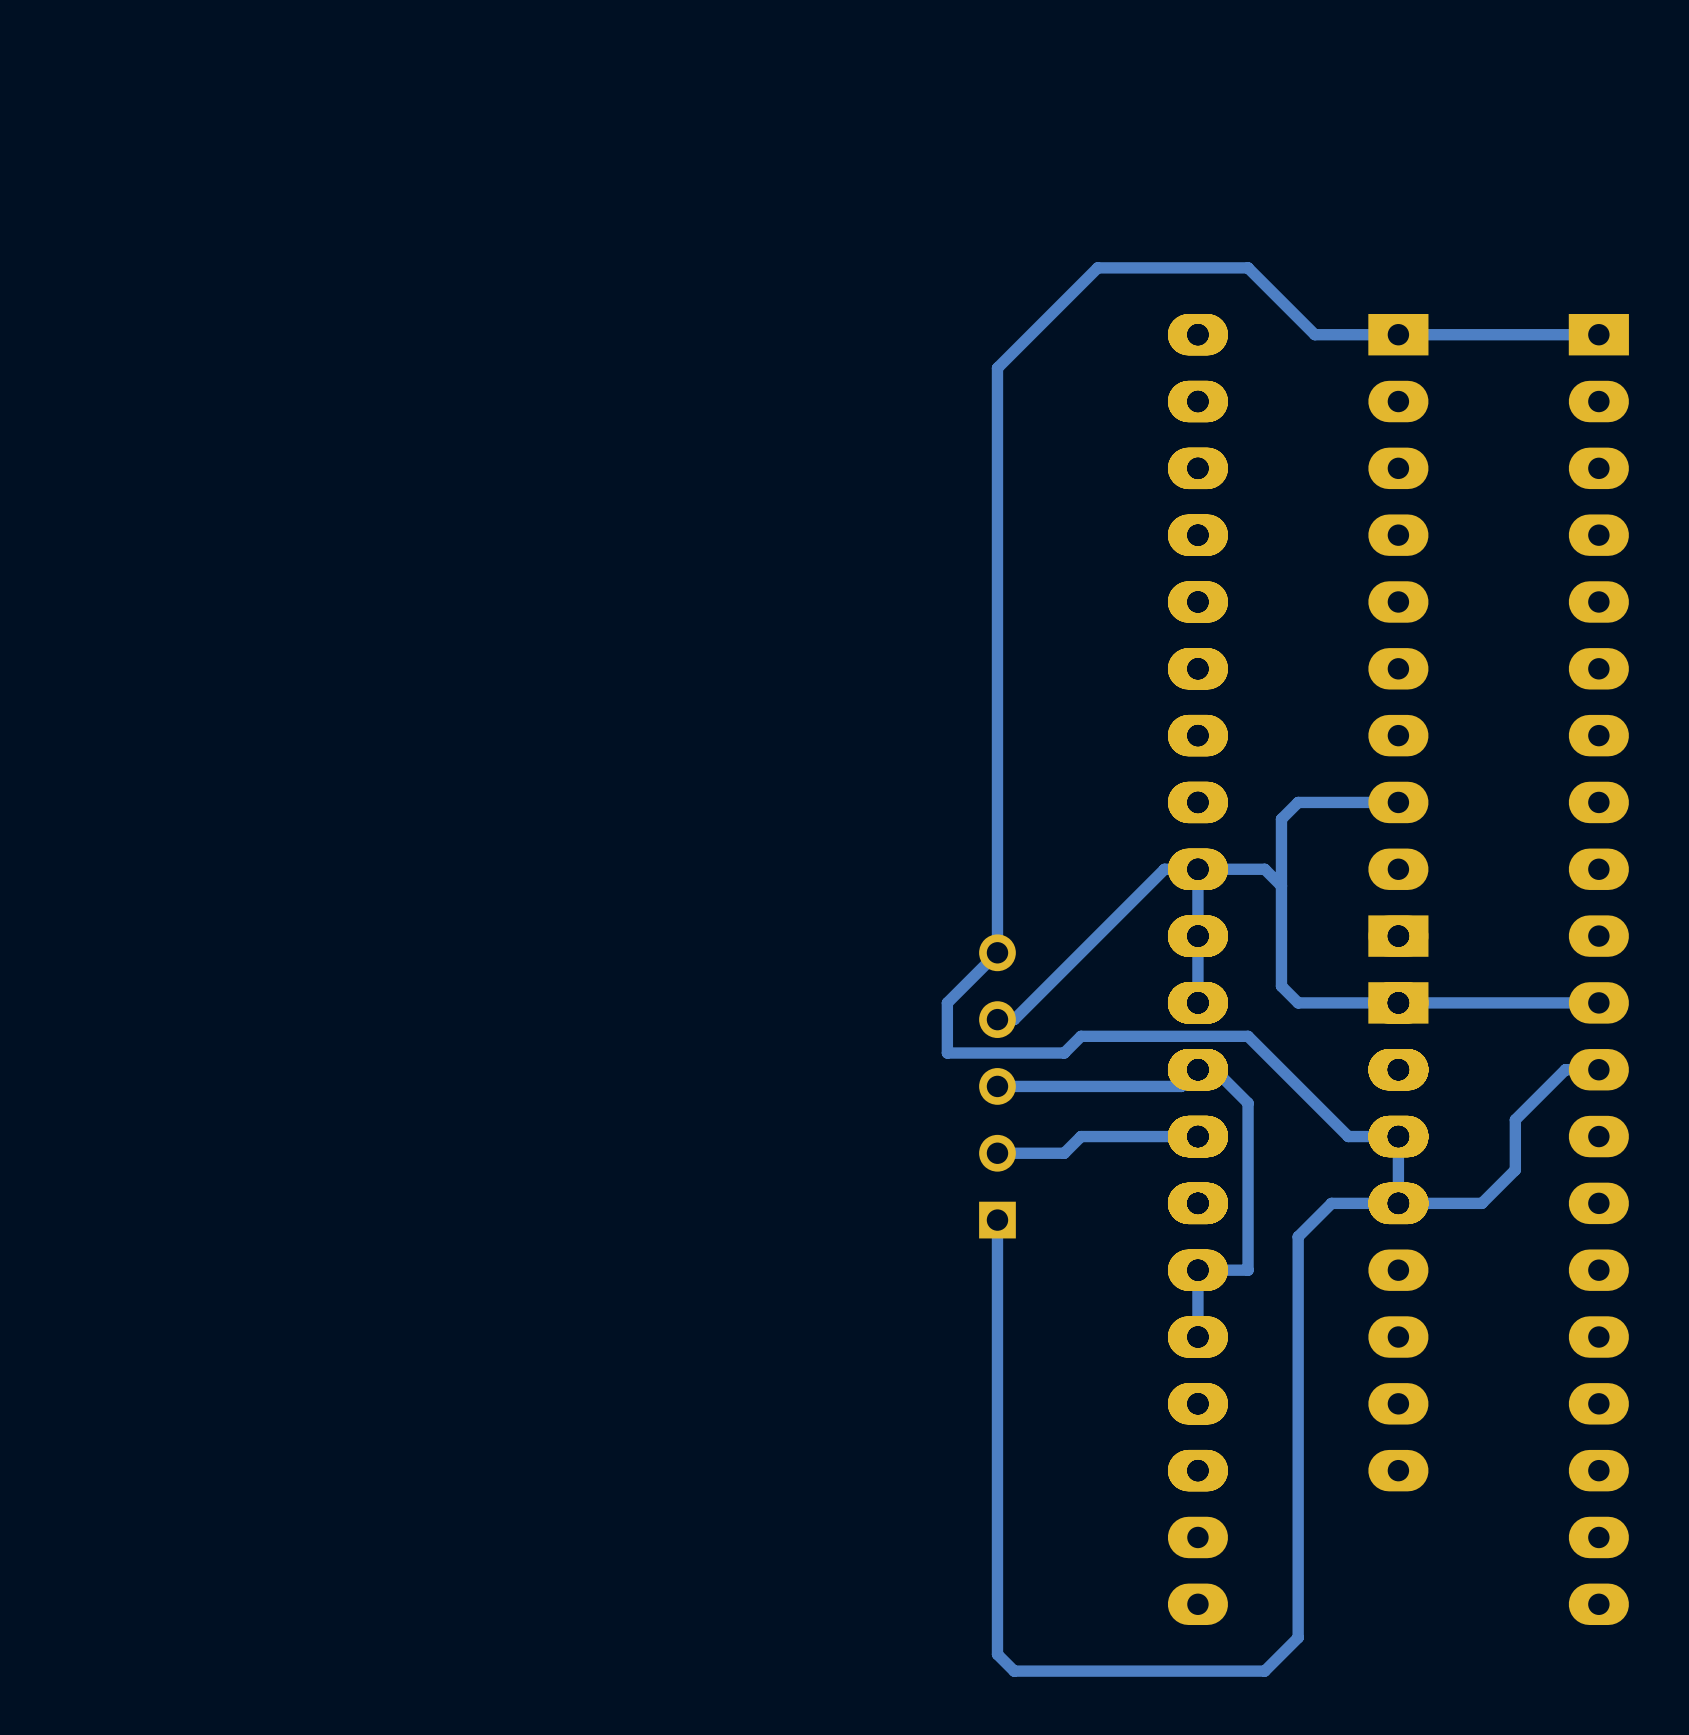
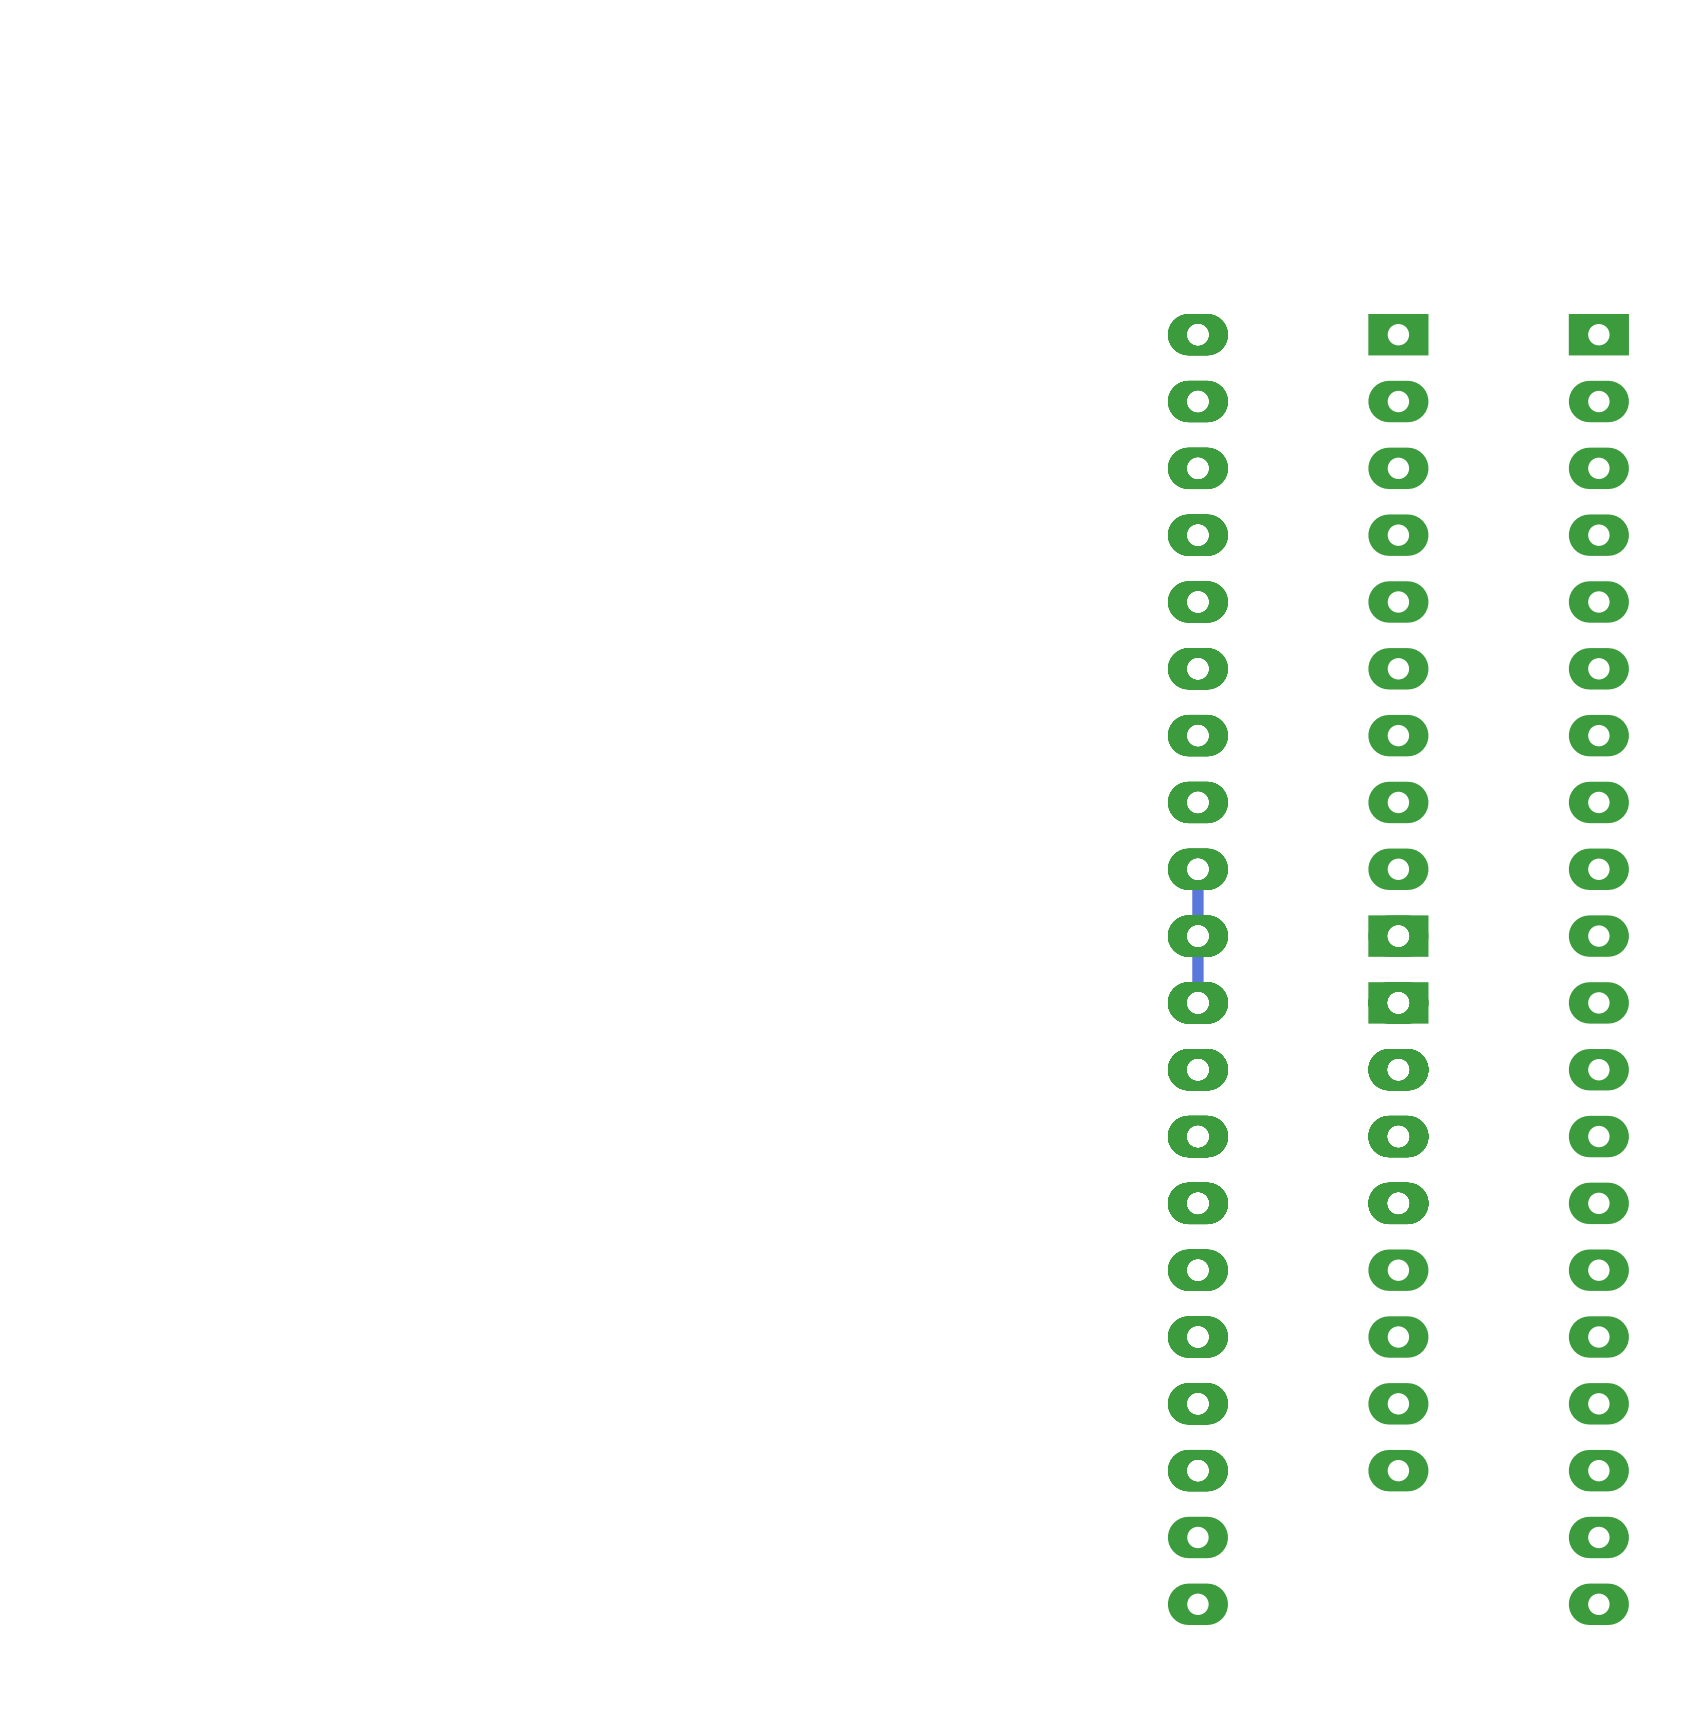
bottom track: (1598, 334) (1314, 334) (1248, 267) (1097, 267) (997, 368) (997, 952) (947, 1002) (947, 1053) (1064, 1053) (1081, 1036) (1248, 1036) (1348, 1136) (1398, 1136) (1398, 1203) -> none
bottom track: (1398, 802) (1298, 802) (1281, 819) (1281, 986) (1298, 1002) (1598, 1002) -> none
bottom track: (1281, 885) (1264, 869) (1164, 869) (1014, 1019) (997, 1019) -> none
bottom track: (1598, 1069) (1565, 1069) (1515, 1119) (1515, 1169) (1481, 1203) (1331, 1203) (1298, 1236) (1298, 1637) (1264, 1671) (1014, 1671) (997, 1654) (997, 1220) -> none
bottom track: (997, 1086) (1181, 1086) (1197, 1069) (1214, 1069) (1248, 1103) (1248, 1270) (1197, 1270) (1197, 1337) -> none
part: (997, 1086) -> none
bottom track: (1197, 1136) (1081, 1136) (1064, 1153) (997, 1153) -> none

